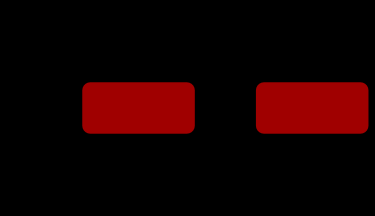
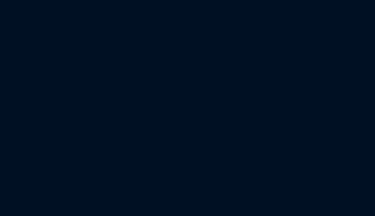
part: (225, 107) -> none

